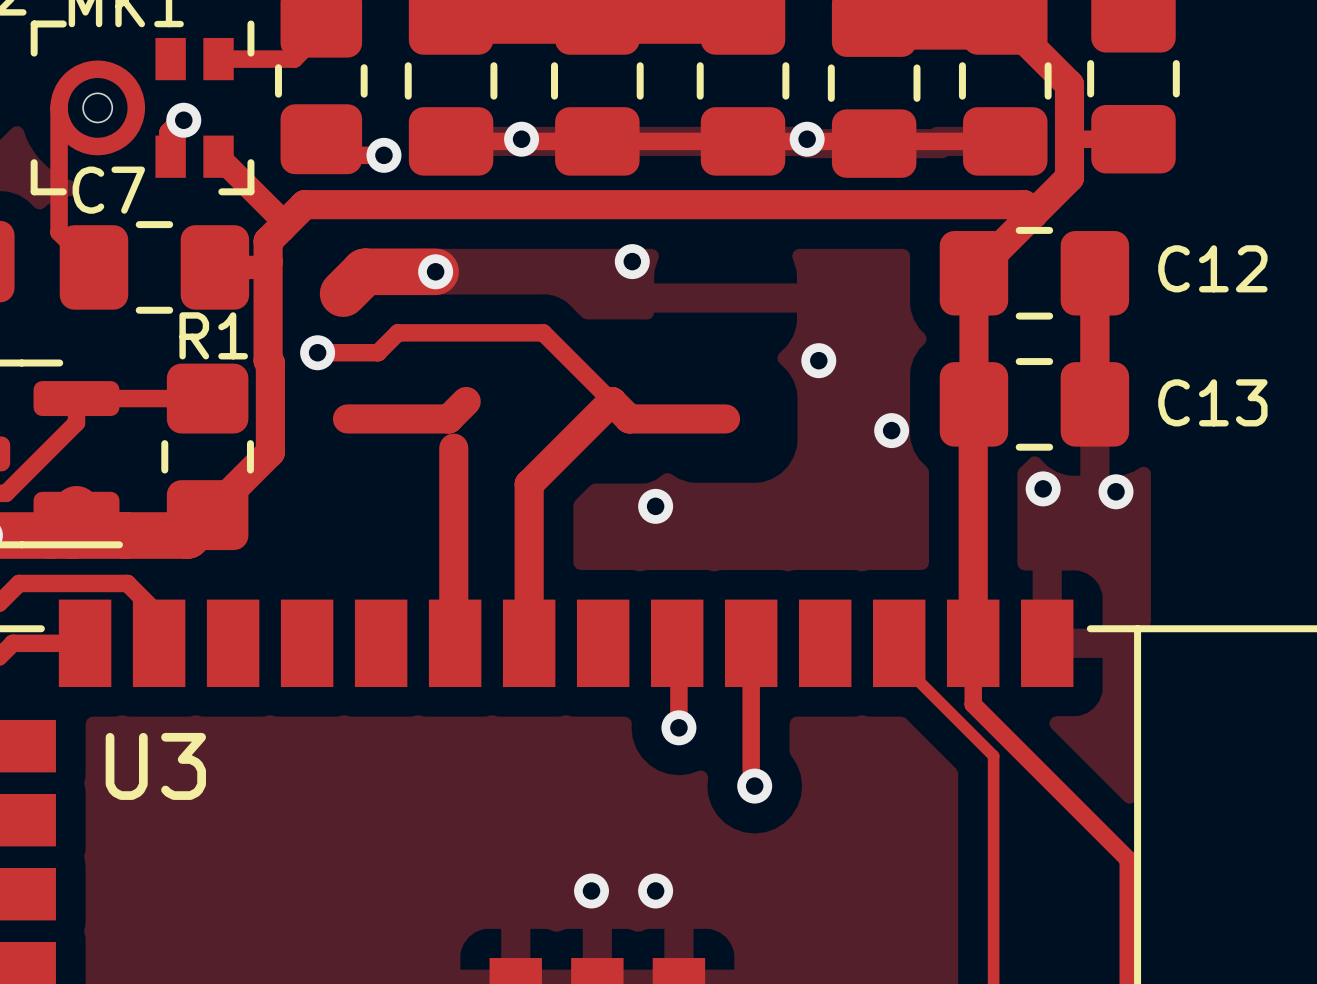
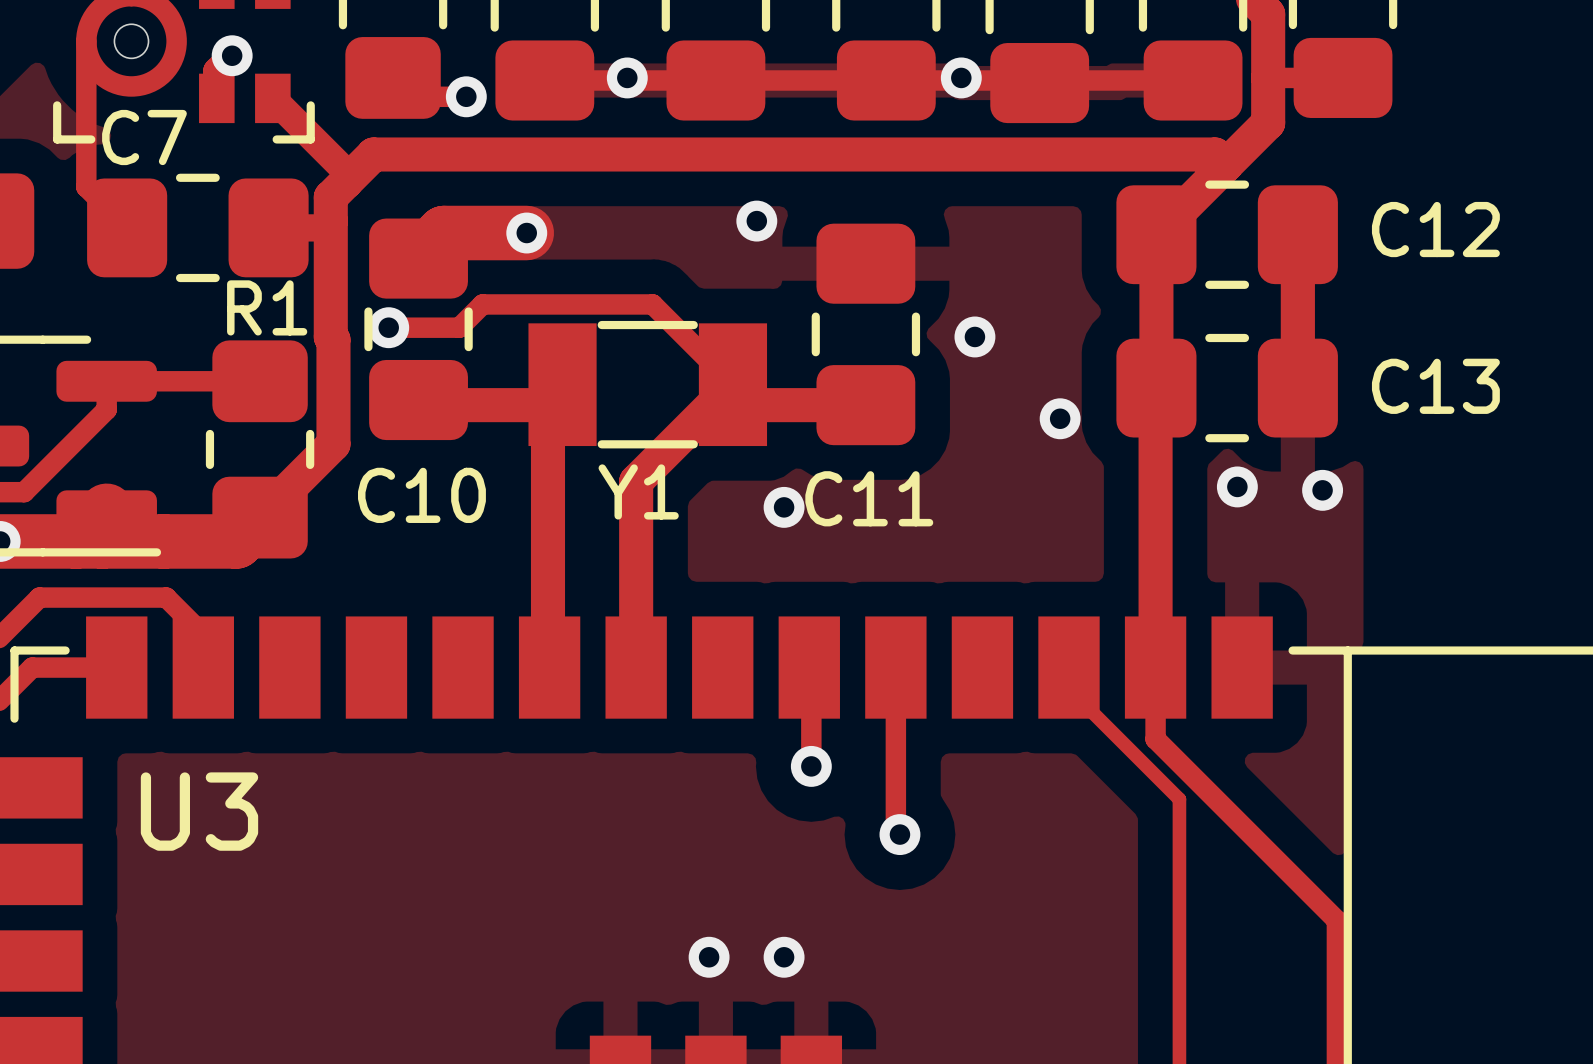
C10: none -> (418, 329)
C11: none -> (865, 334)
Y1: none -> (647, 384)

